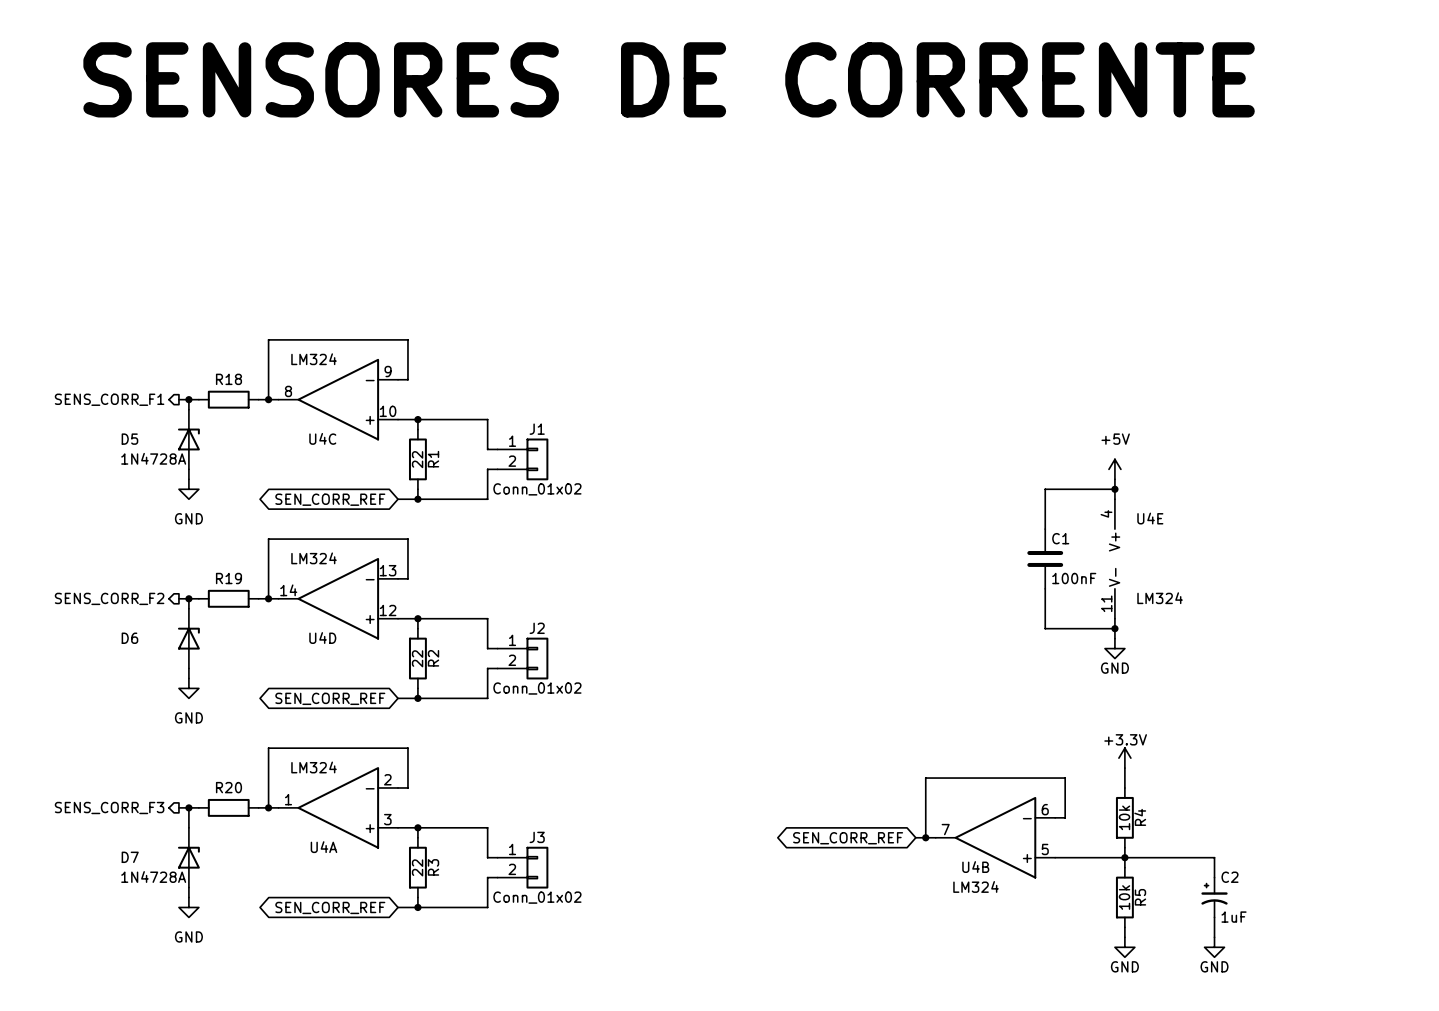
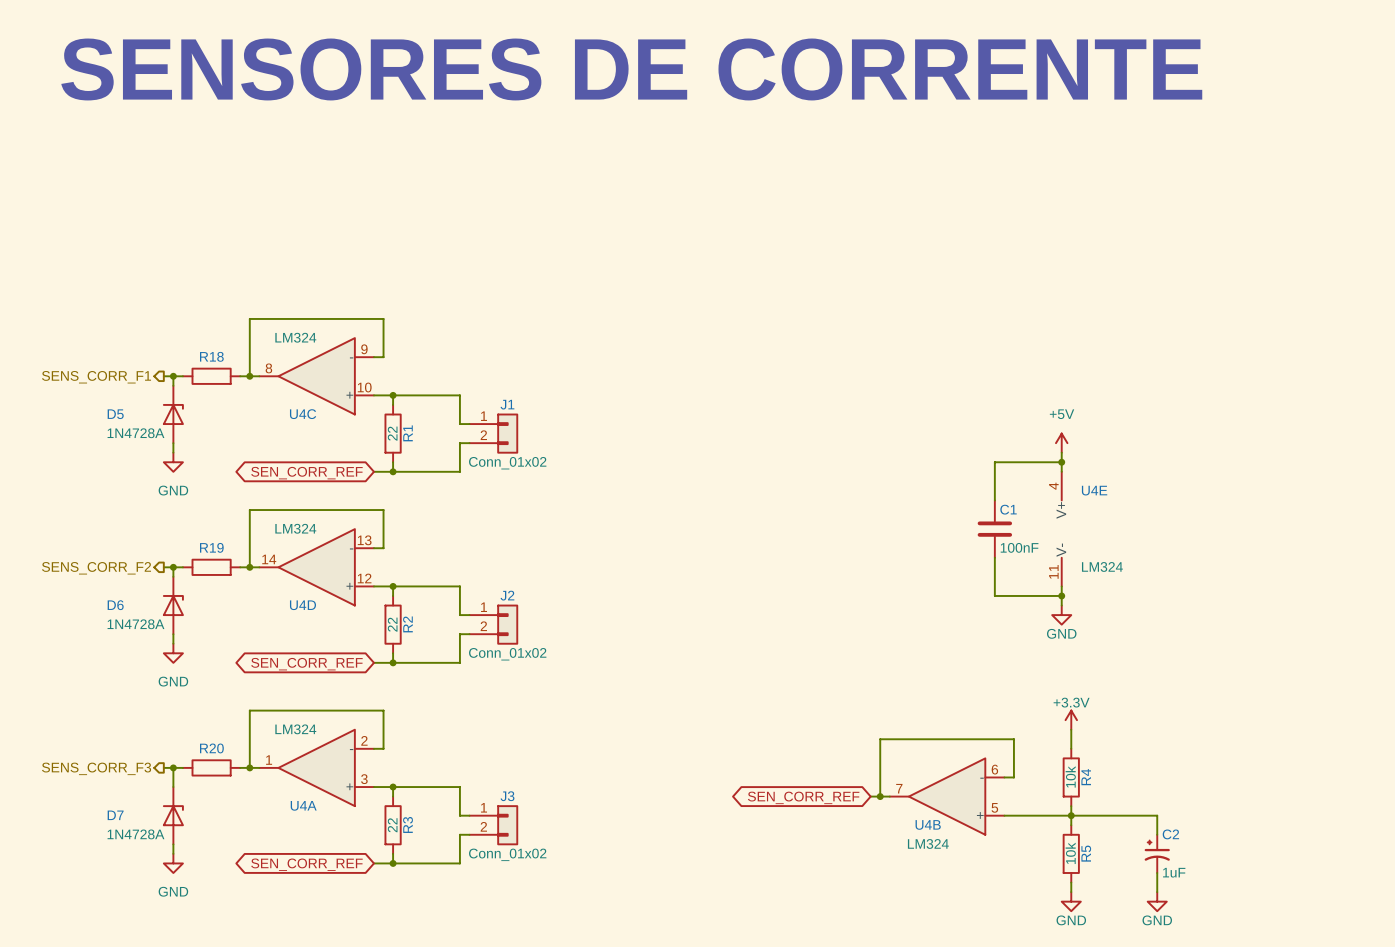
D6 value: none -> 1N4728A (135, 624)

